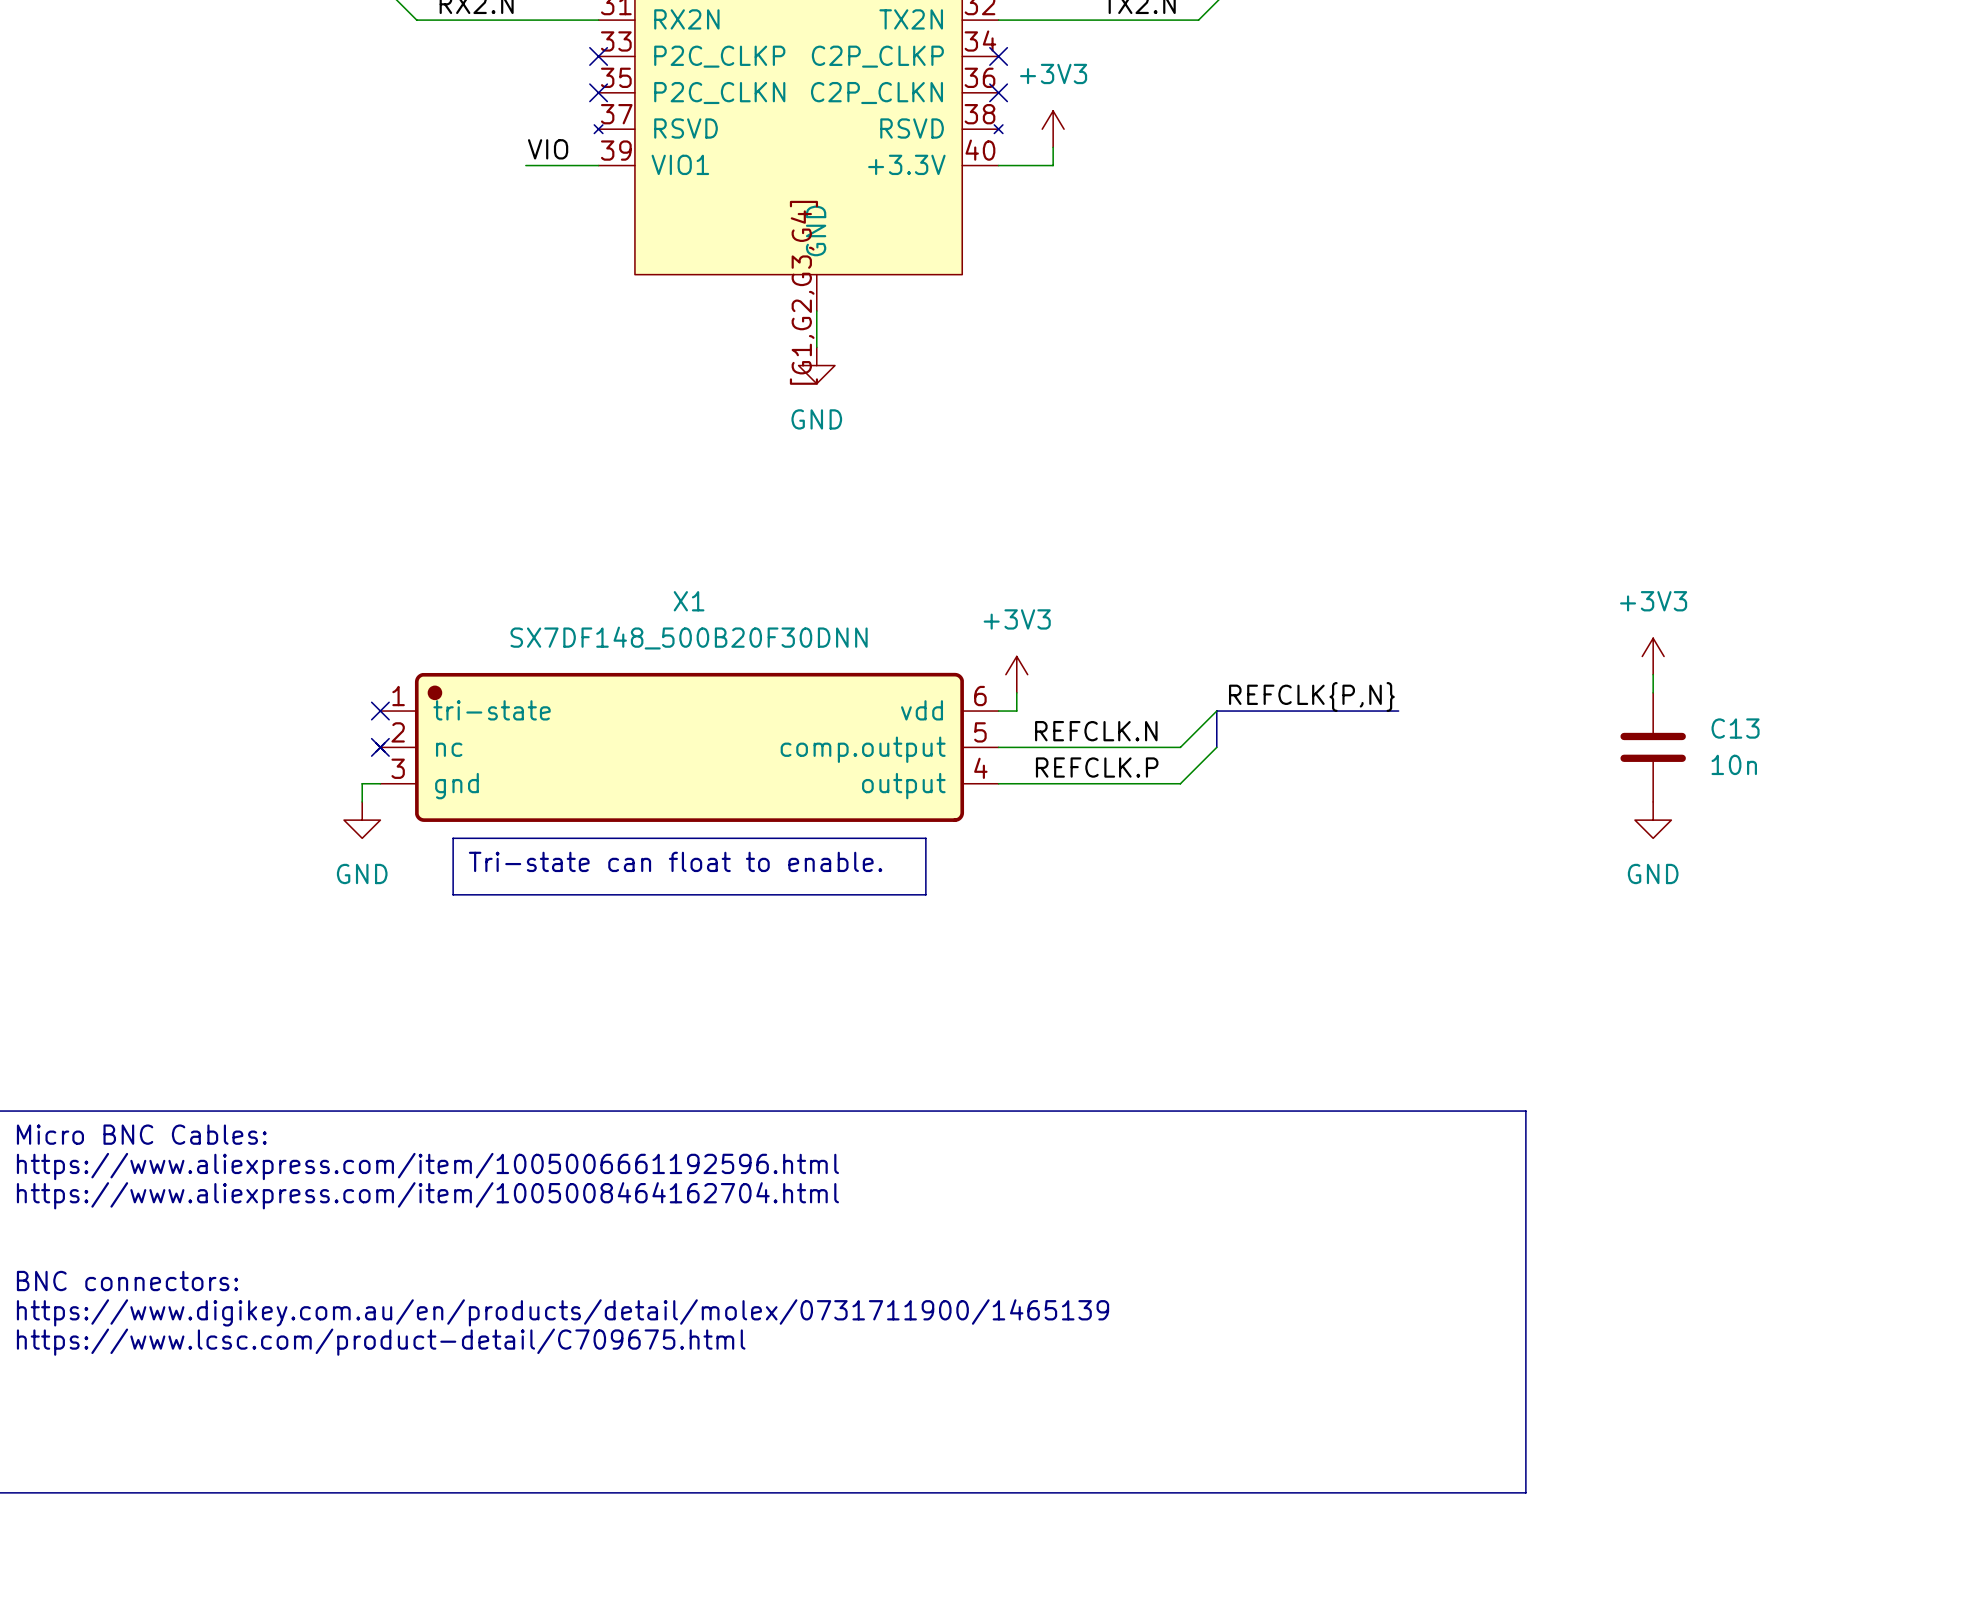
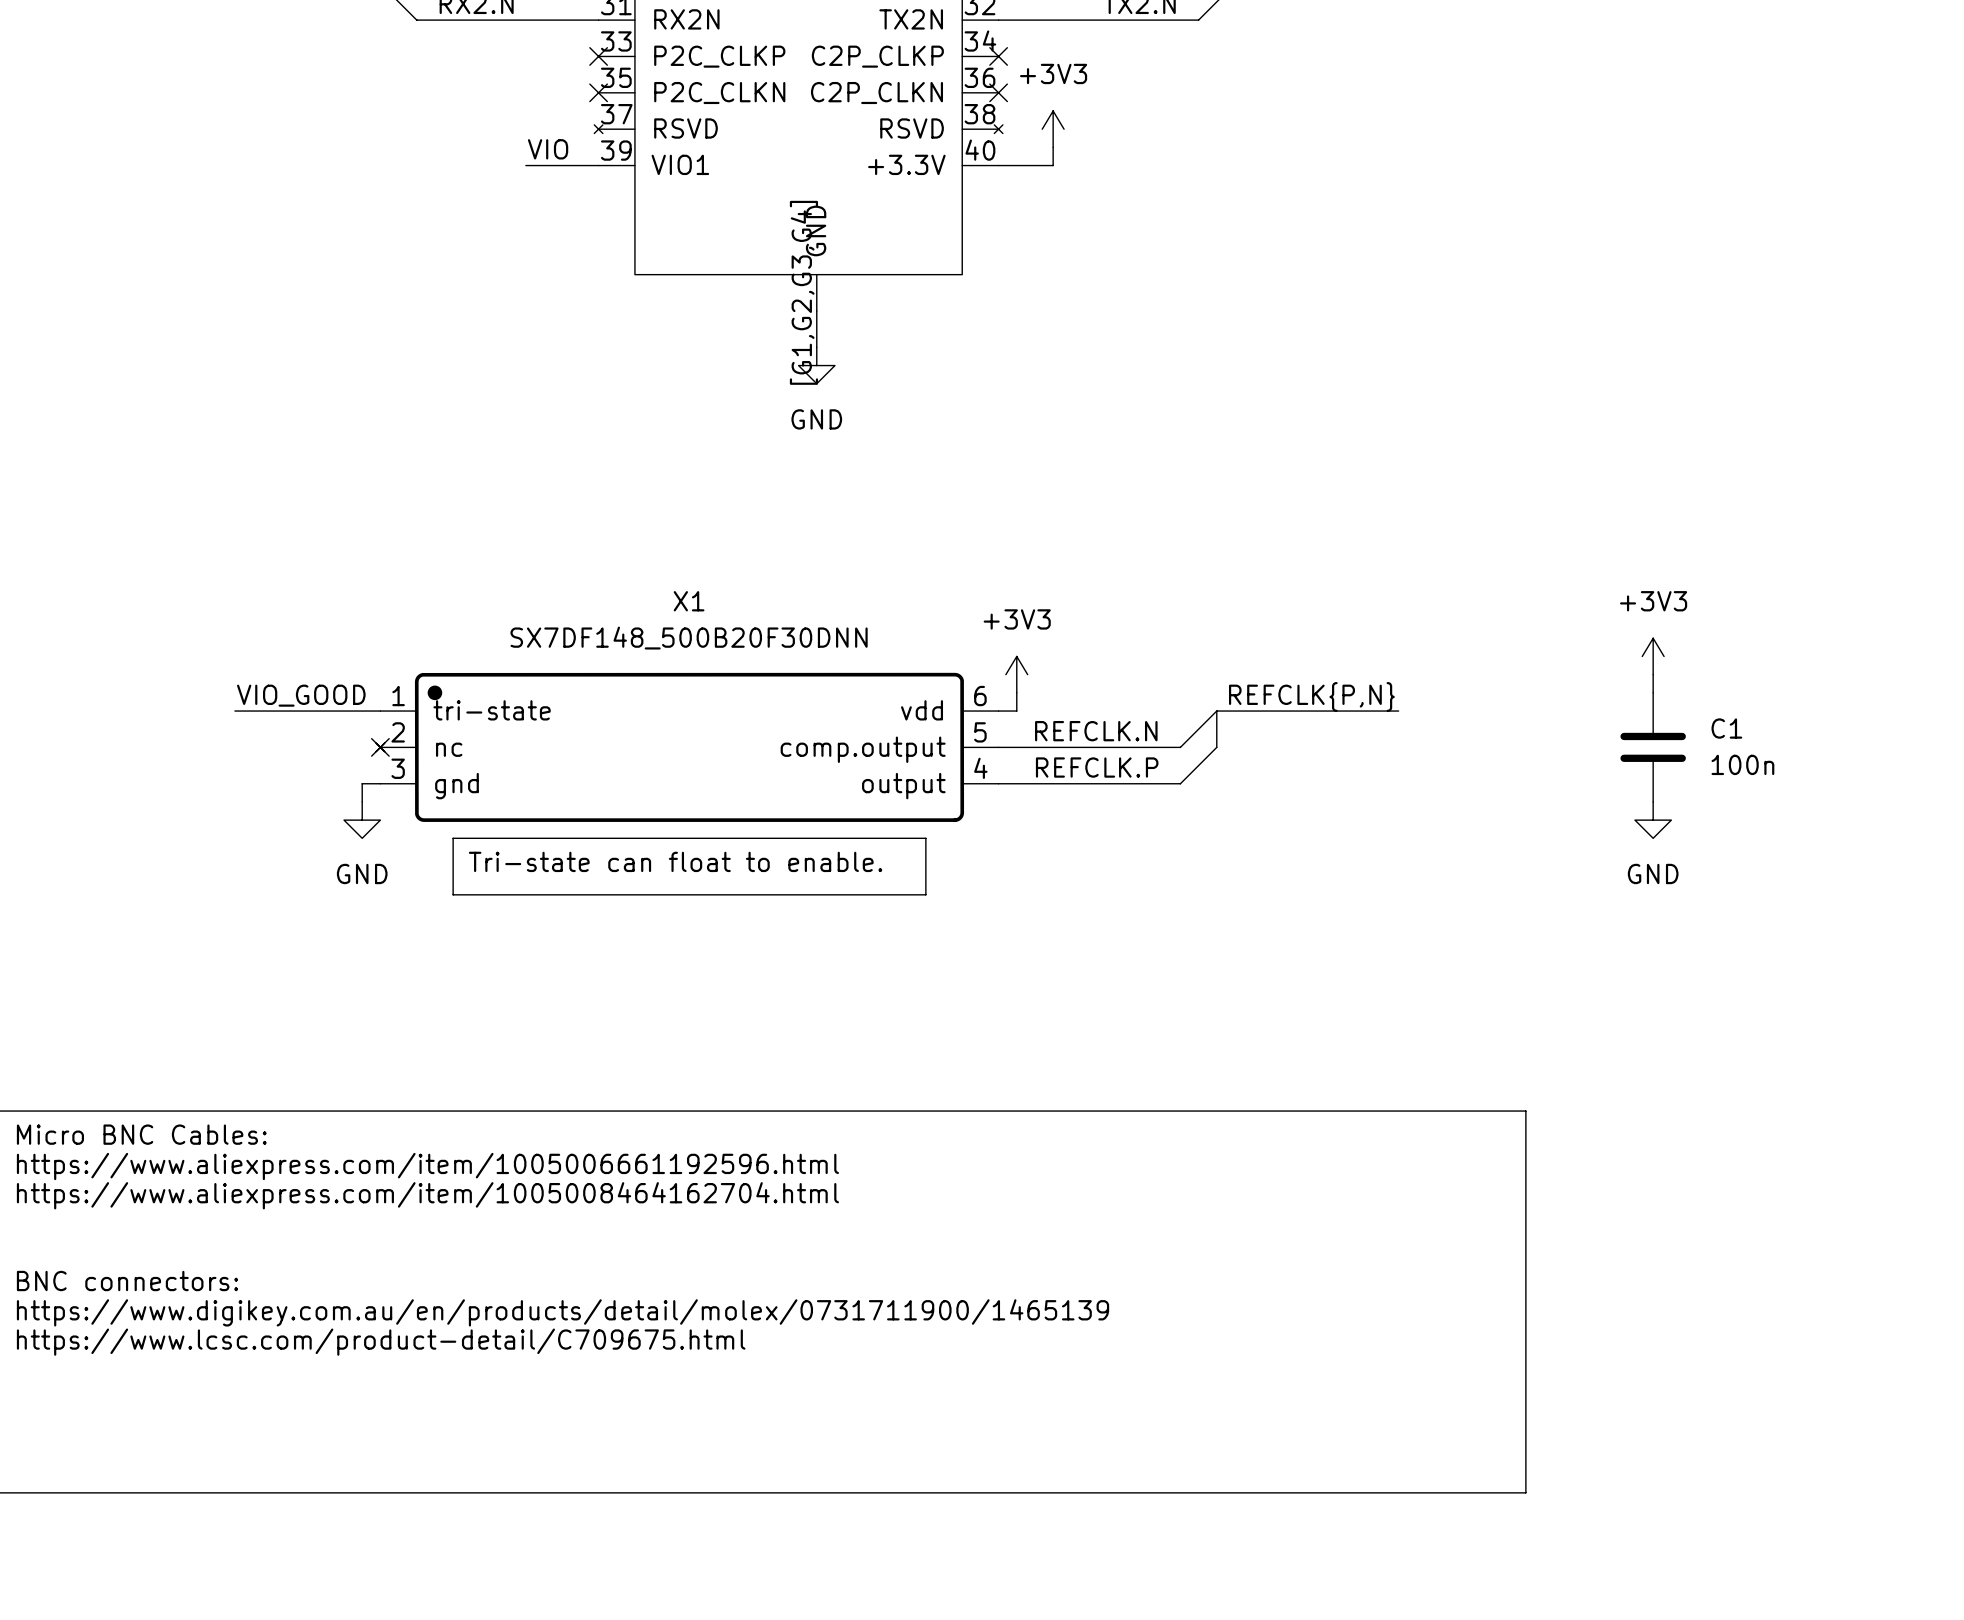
label: none -> VIO_GOOD (301, 695)
wire: none -> (234, 711) (380, 711)
no-connect mark: (380, 711) -> none
C13 name: C13 (1735, 728) -> C1 (1726, 728)
C13 value: 10n (1734, 764) -> 100n (1742, 764)

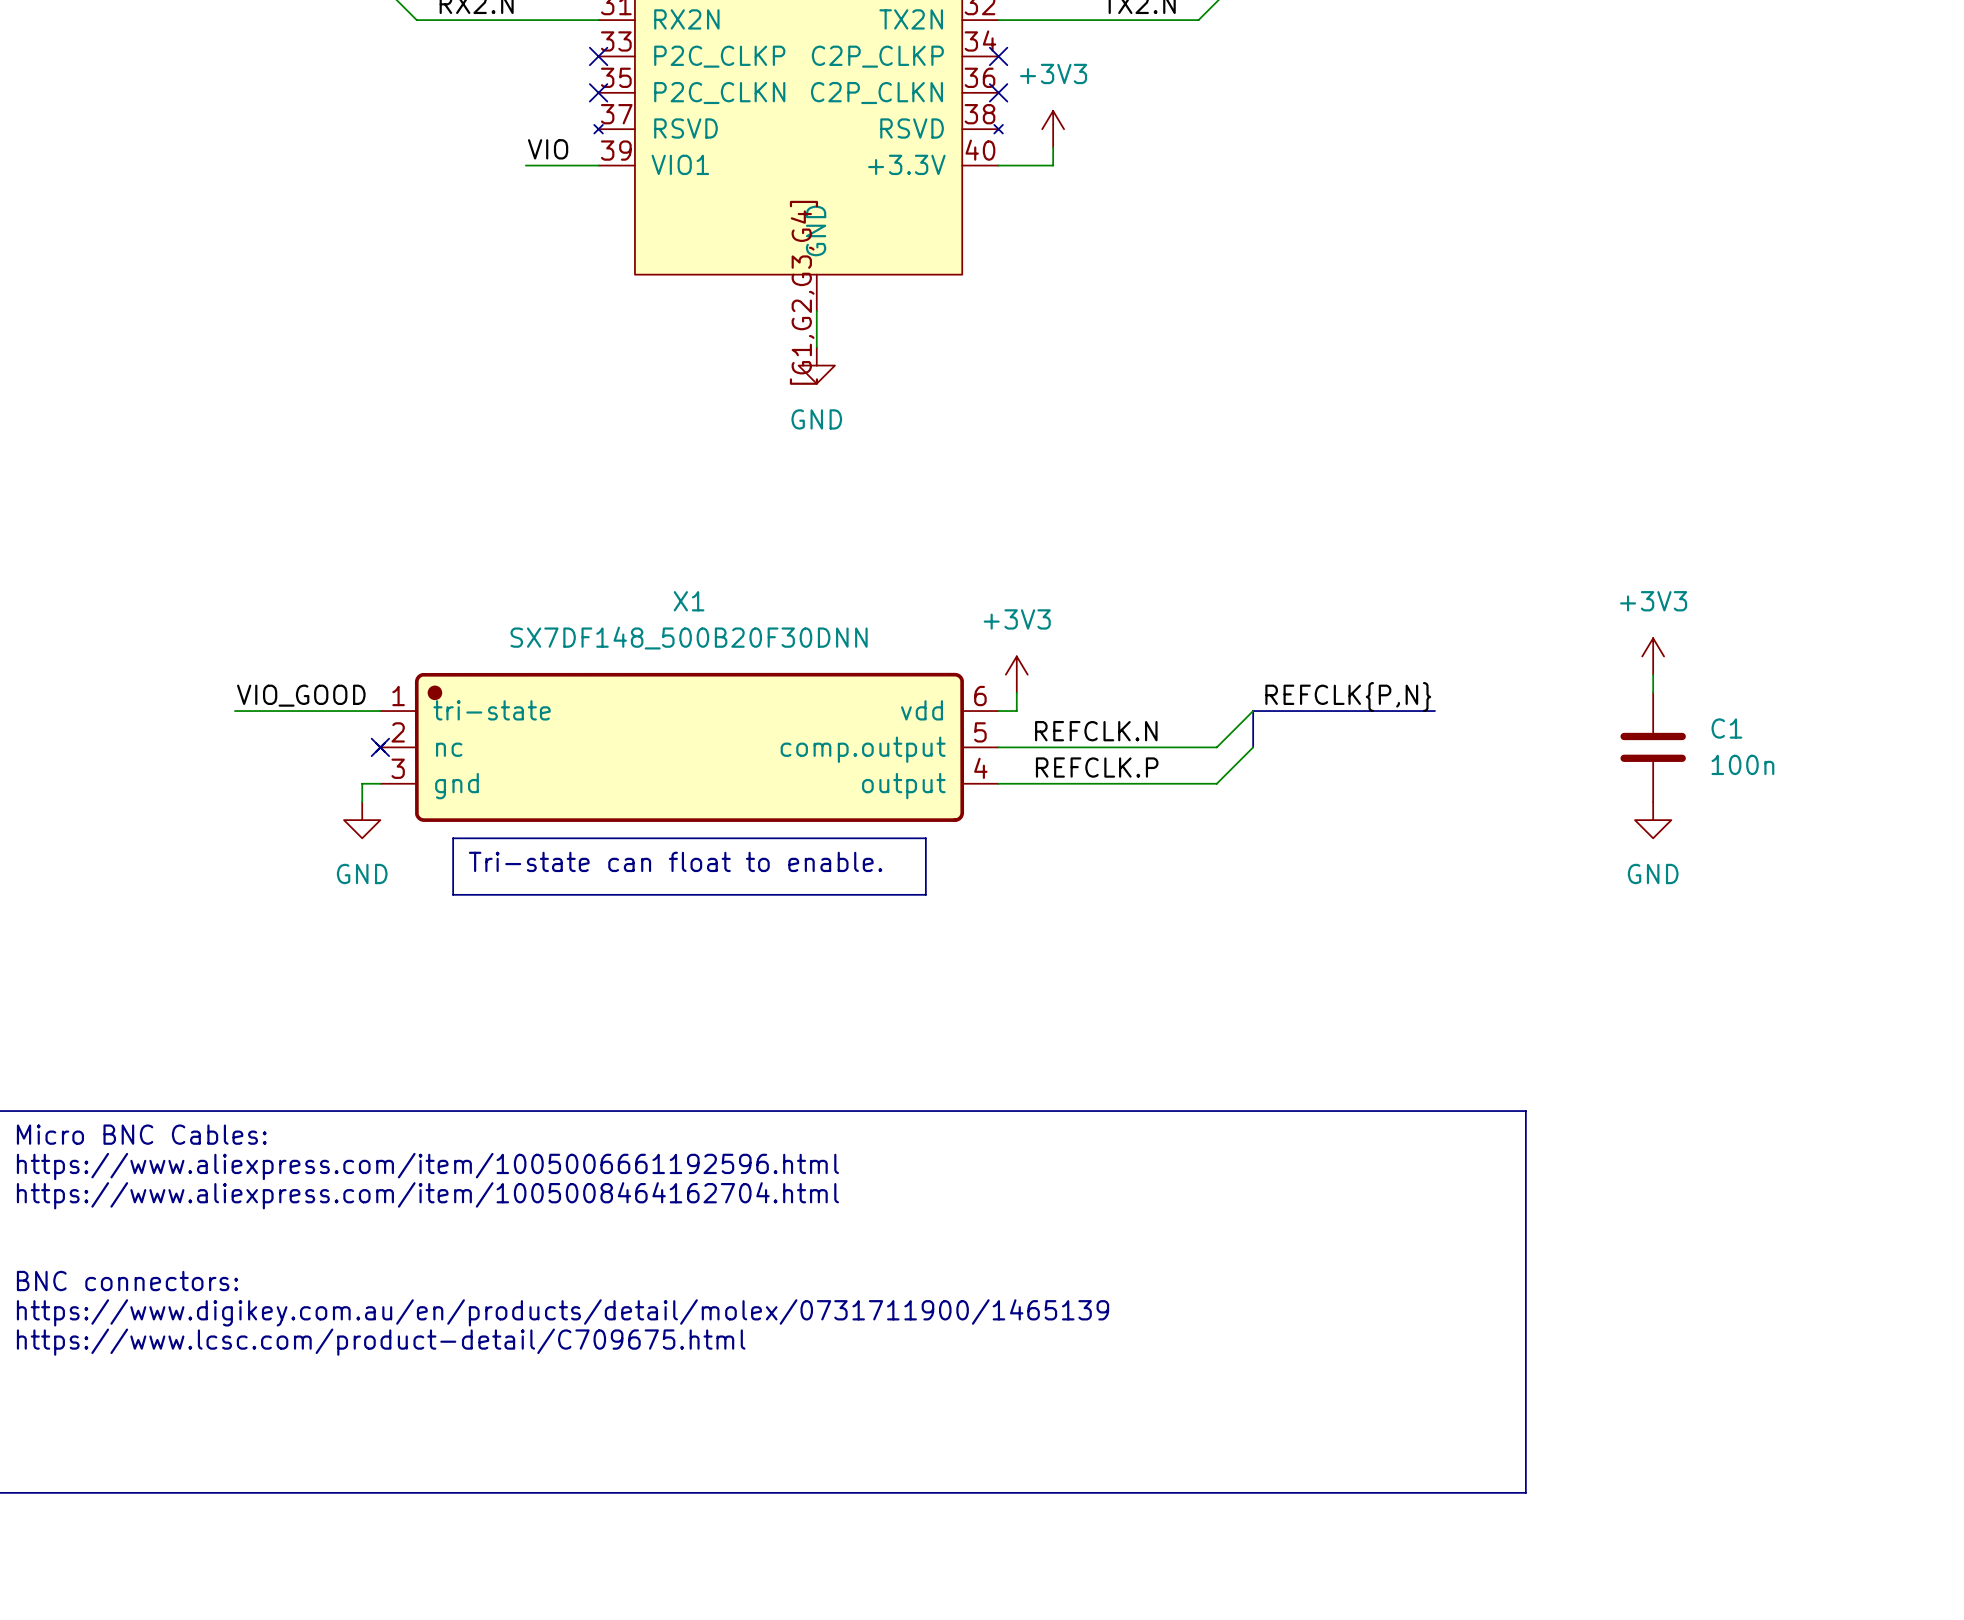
label position: REFCLK{P,N} (1311, 696) -> REFCLK{P,N} (1348, 696)
wire: (1216, 711) (1180, 747) -> (1253, 711) (1216, 747) (1180, 747)
bus: (1253, 711) (1216, 711) (1216, 747) -> (1253, 711) (1253, 747)
bus: none -> (1398, 711) (1434, 711)
wire: (1216, 747) (1180, 783) -> (1253, 747) (1216, 783) (1180, 783)

